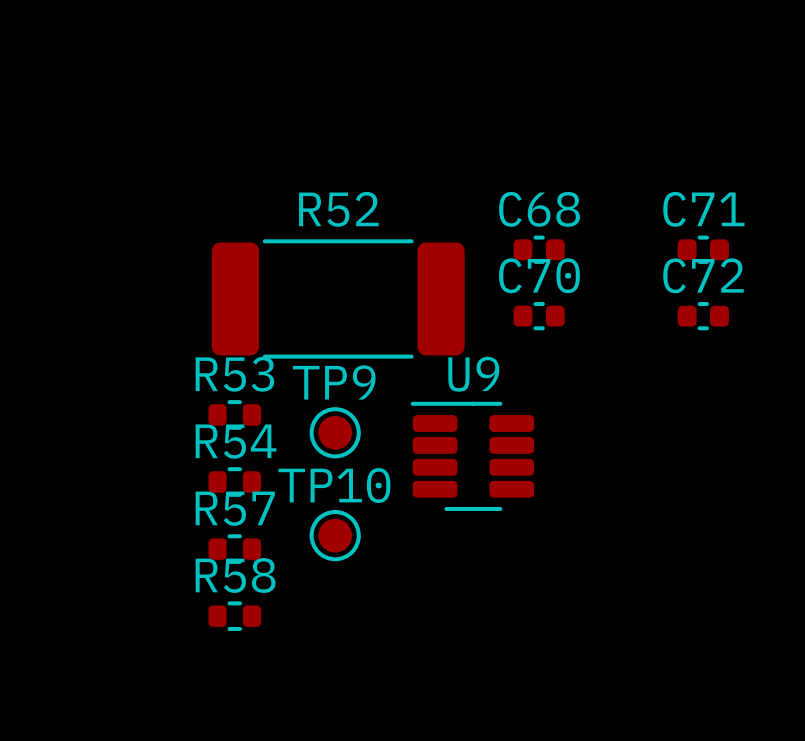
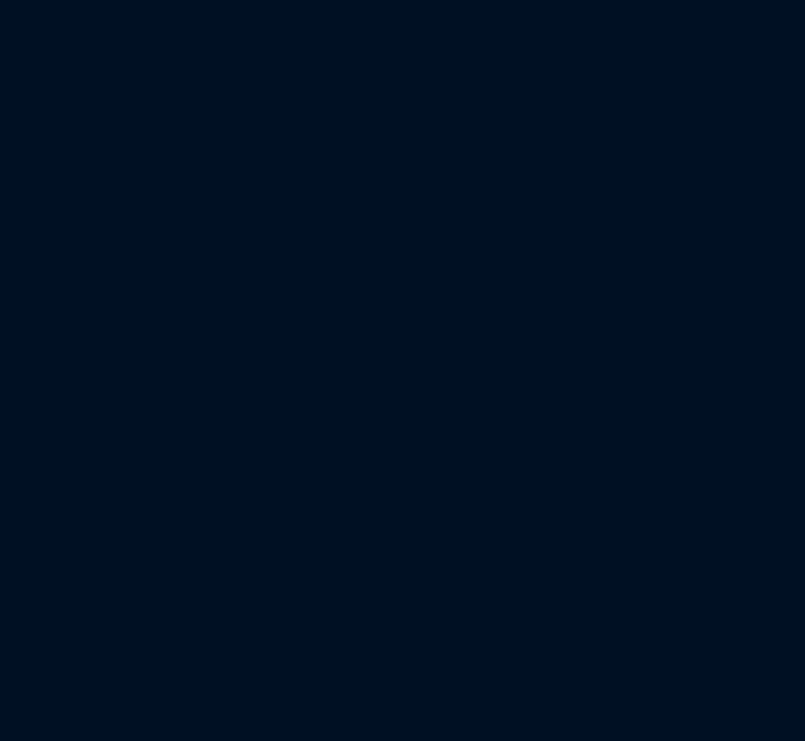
C68: (539, 249) -> none
C71: (703, 249) -> none
R52: (338, 298) -> none
C70: (539, 316) -> none
C72: (703, 316) -> none
R53: (234, 414) -> none
TP9: (335, 432) -> none
U9: (472, 456) -> none
R54: (234, 482) -> none
TP10: (335, 535) -> none
R57: (234, 549) -> none
R58: (234, 616) -> none

